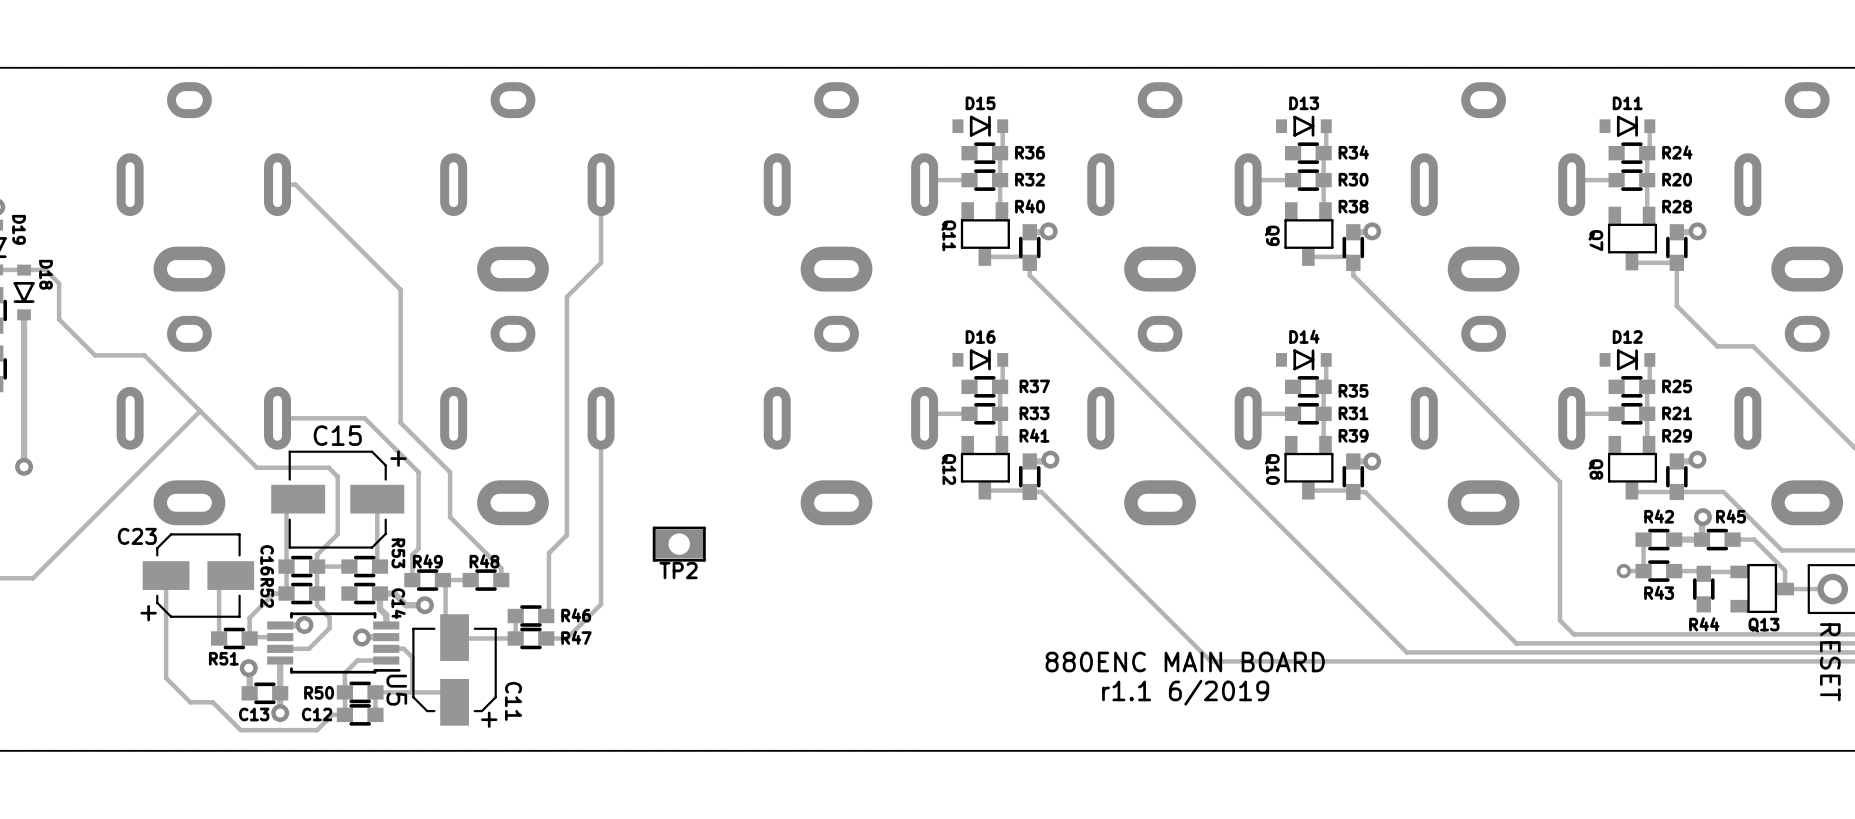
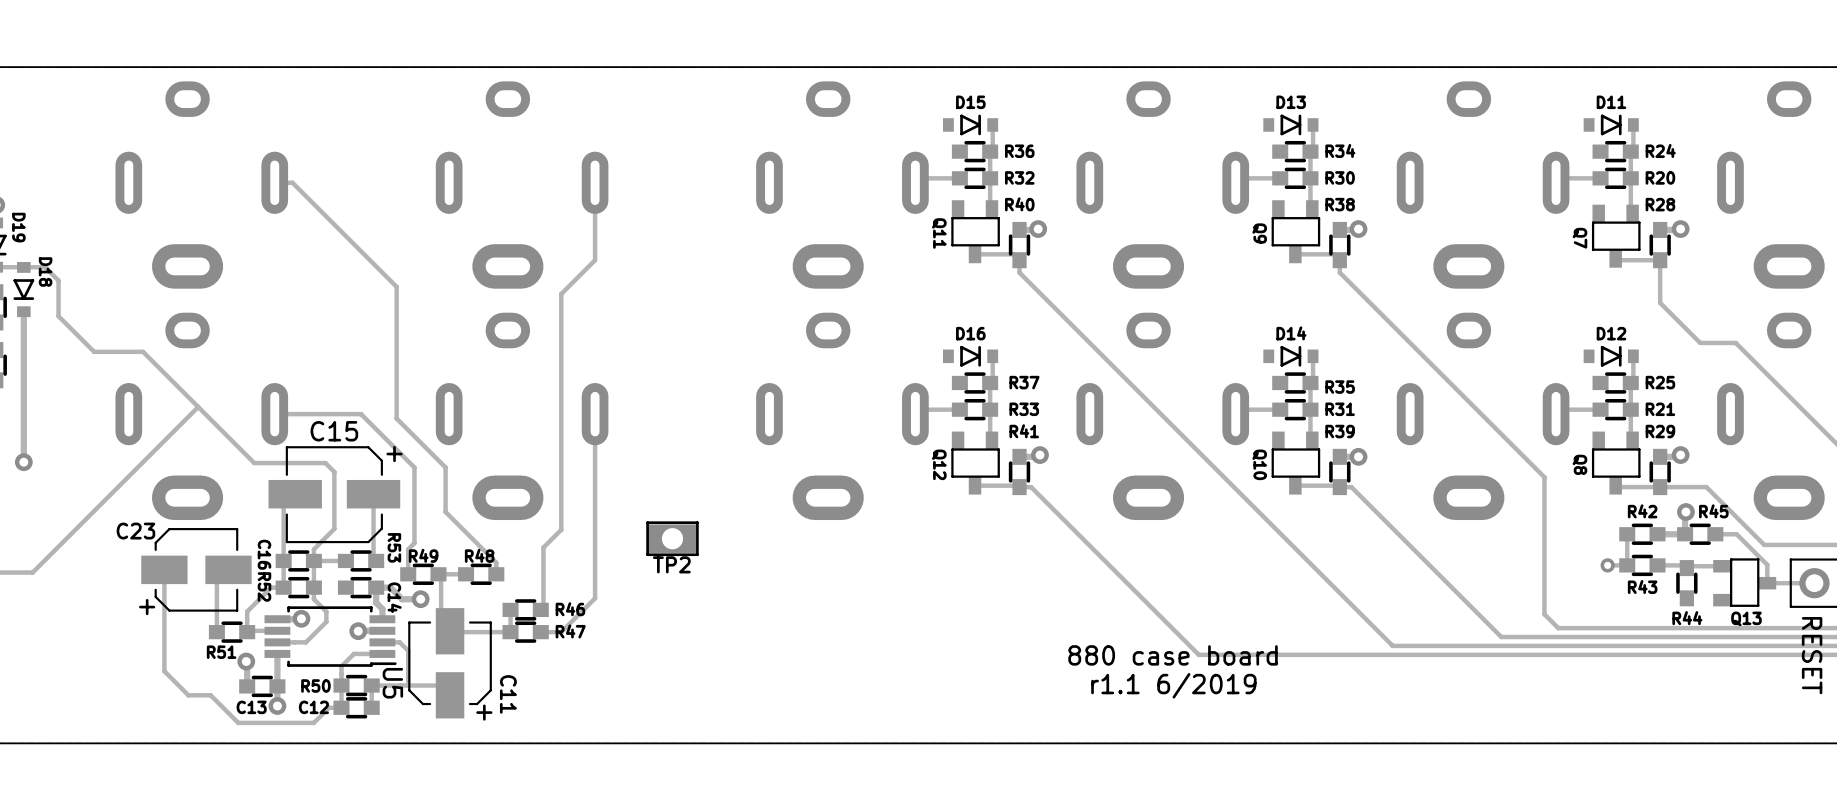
text: 880ENC MAIN BOARD (1185, 661) -> 880 case board (1173, 655)

